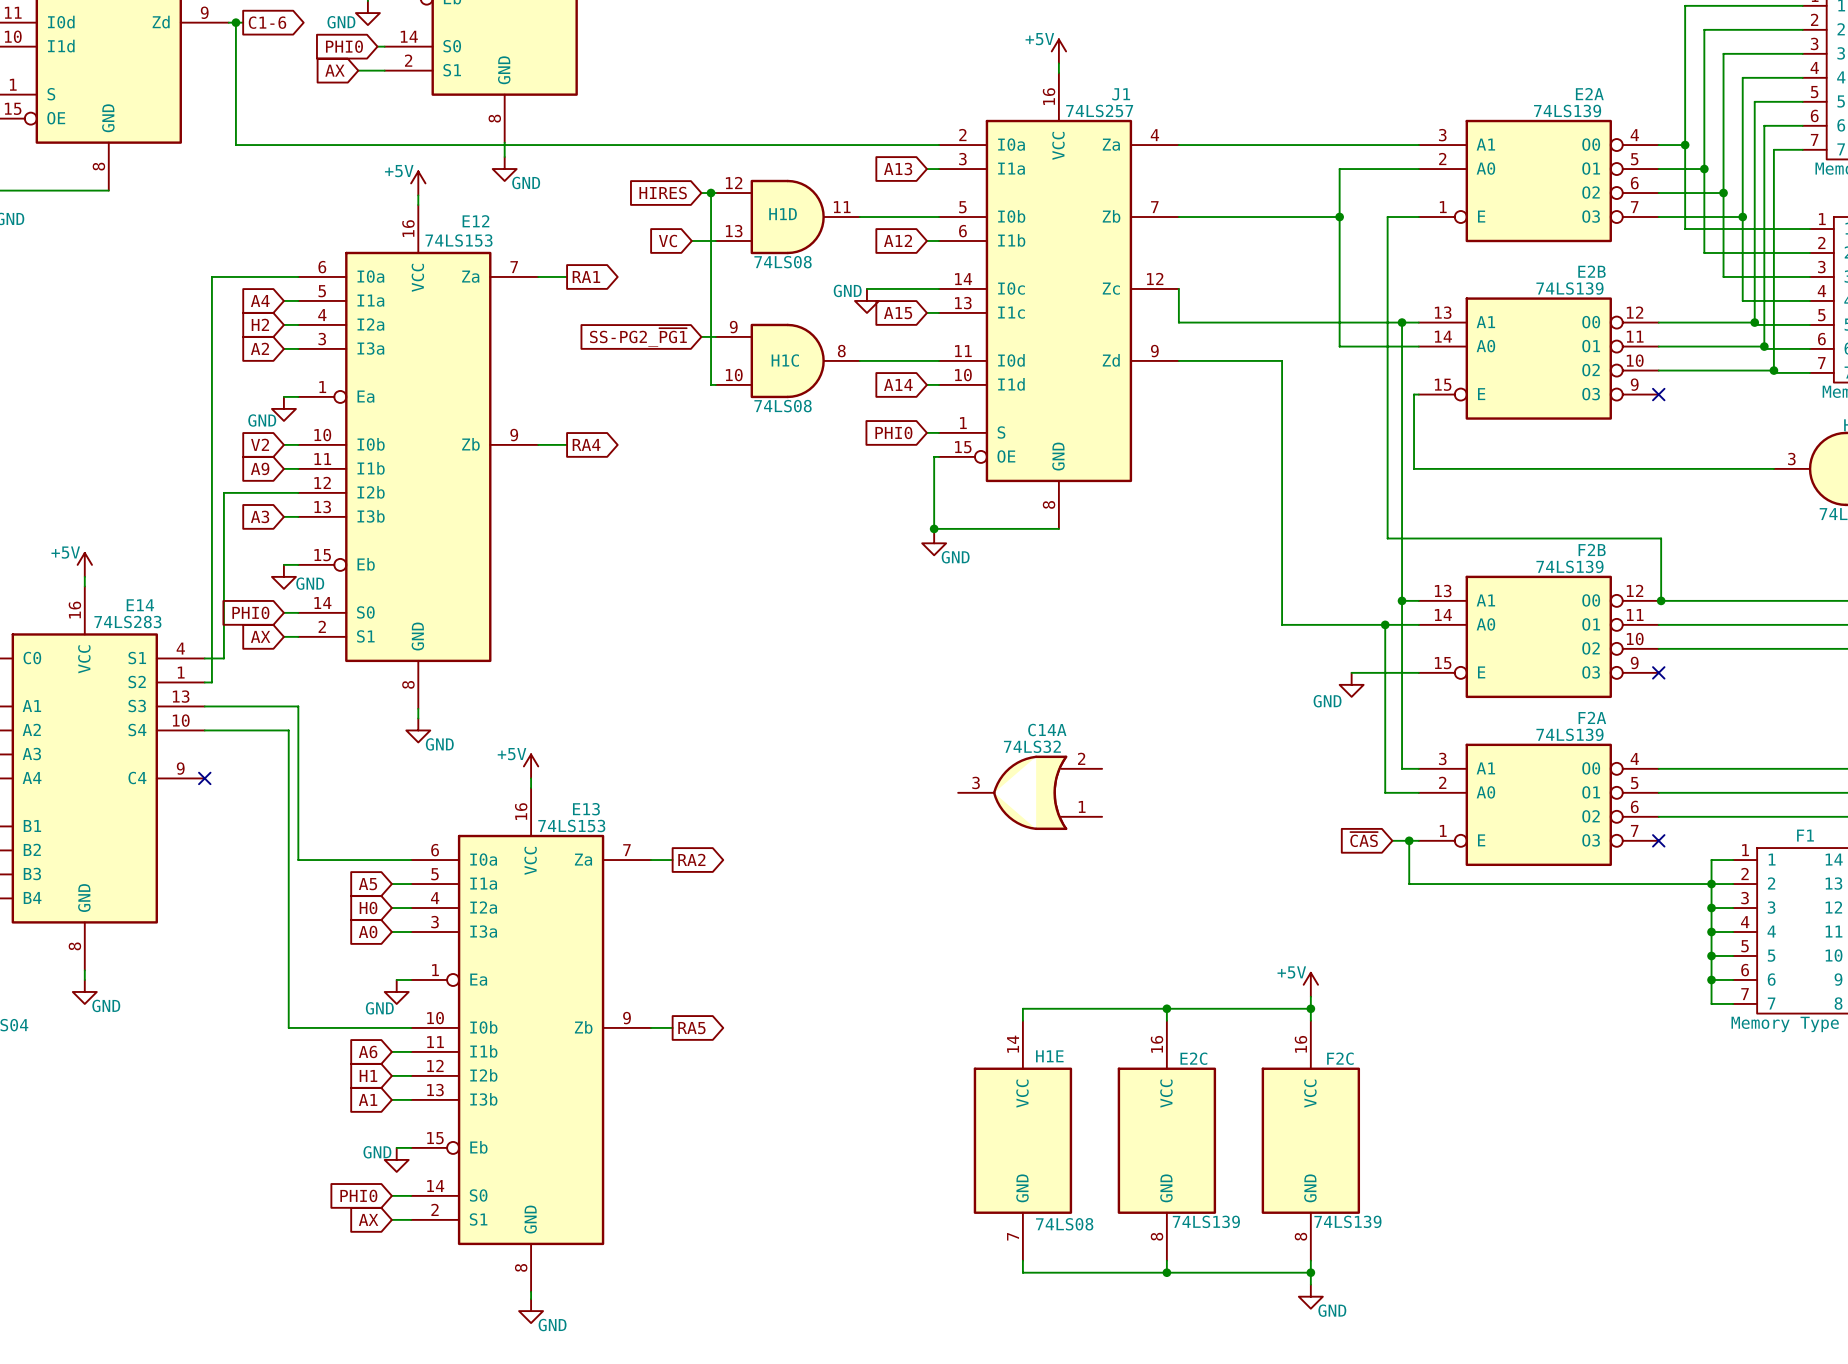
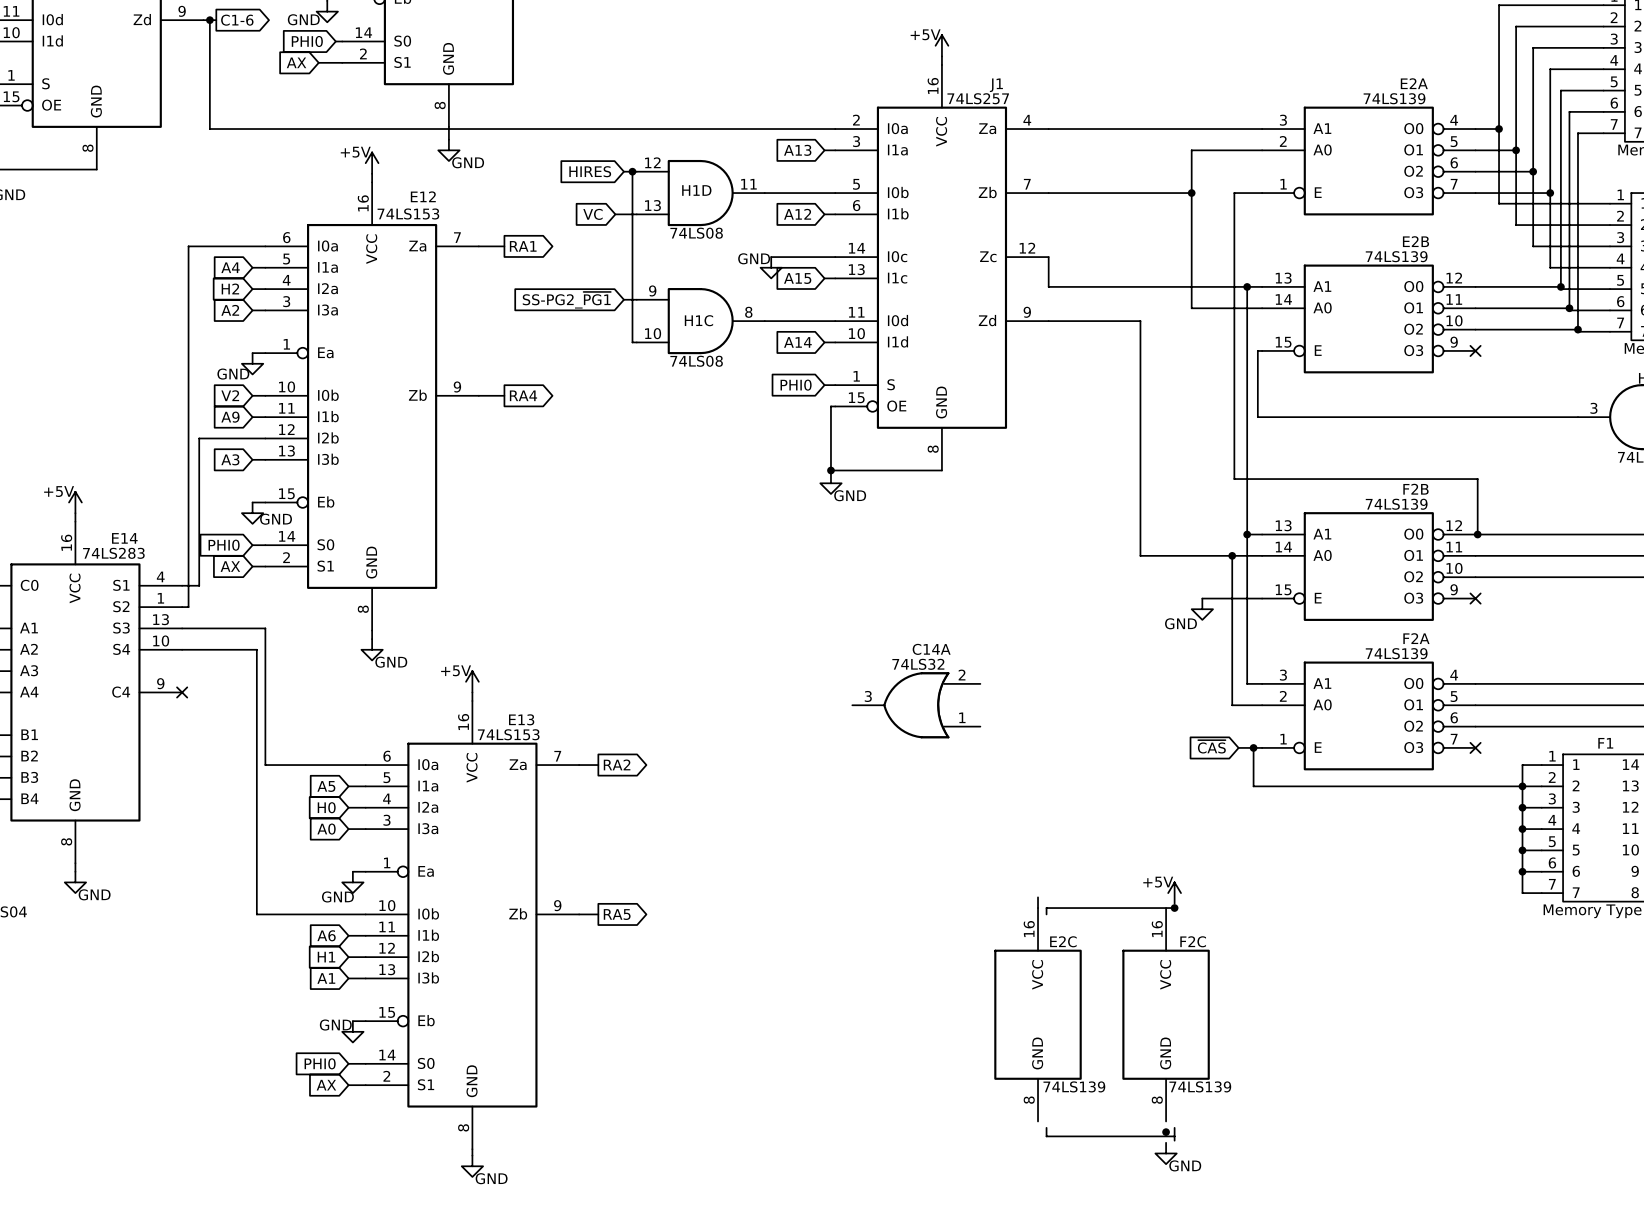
power symbol position: +5V (1310, 984) -> +5V (1174, 893)
wire: (1310, 996) (1310, 1020) -> none
junction: (1166, 1008) -> none
wire: (1310, 1008) (1022, 1008) (1022, 1020) -> none
junction position: (1310, 1008) -> (1174, 908)
wire: none -> (1174, 908) (1046, 908) (1046, 914)
H1E: 74LS08 (1022, 1140) -> none
wire: (1022, 1260) (1022, 1272) (1310, 1272) -> none
wire: (1166, 1260) (1166, 1272) -> none
wire: (1310, 1260) (1310, 1284) -> none
wire: none -> (1046, 1127) (1046, 1136) (1174, 1136)
wire: none -> (1174, 1127) (1174, 1140)
junction: (1166, 1272) -> none

